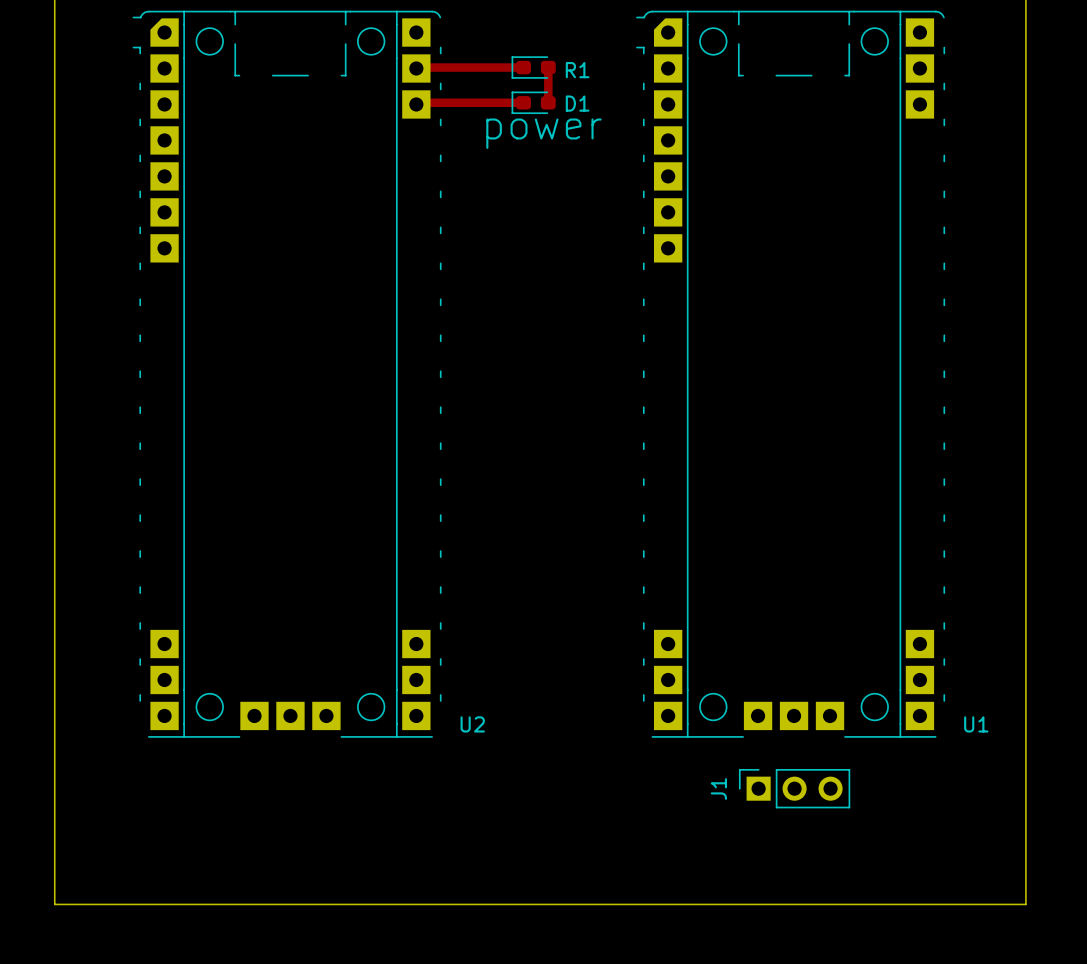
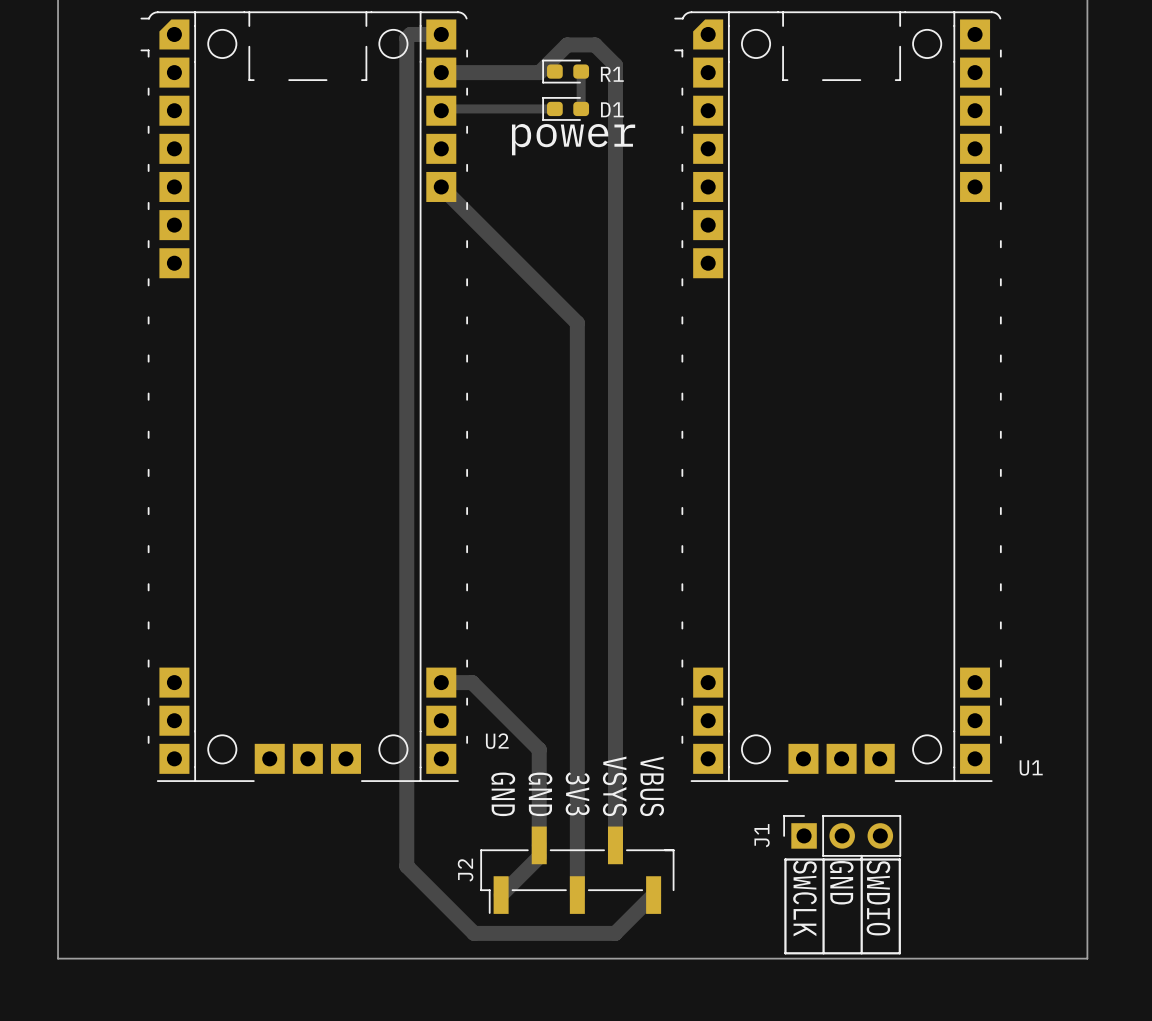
U2 footprint: [132, 10, 442, 738] -> [140, 11, 469, 782]
U1 footprint: [636, 10, 946, 738] -> [674, 11, 1002, 782]
track: none -> (441, 34) (410, 34) (406, 38) (406, 866) (474, 933) (615, 933) (653, 895)
track: none -> (441, 72) (539, 72) (567, 44) (595, 44) (615, 65) (615, 845)
track: none -> (441, 186) (577, 323) (577, 895)
track: none -> (441, 682) (472, 682) (539, 749) (539, 856) (501, 895)
text: none -> VBUS (652, 786)
text: none -> VSYS (614, 786)
text: none -> GND (503, 794)
text: none -> GND (540, 794)
text: none -> 3V3 (577, 793)
line: none -> (861, 855) (861, 953)
line: none -> (785, 859) (899, 859) (899, 953) (785, 953) (785, 859)
line: none -> (823, 859) (823, 953)
J2: none -> (577, 870)
text: none -> GND (841, 882)
text: none -> SWDIO (878, 898)
text: none -> SWCLK (804, 898)

